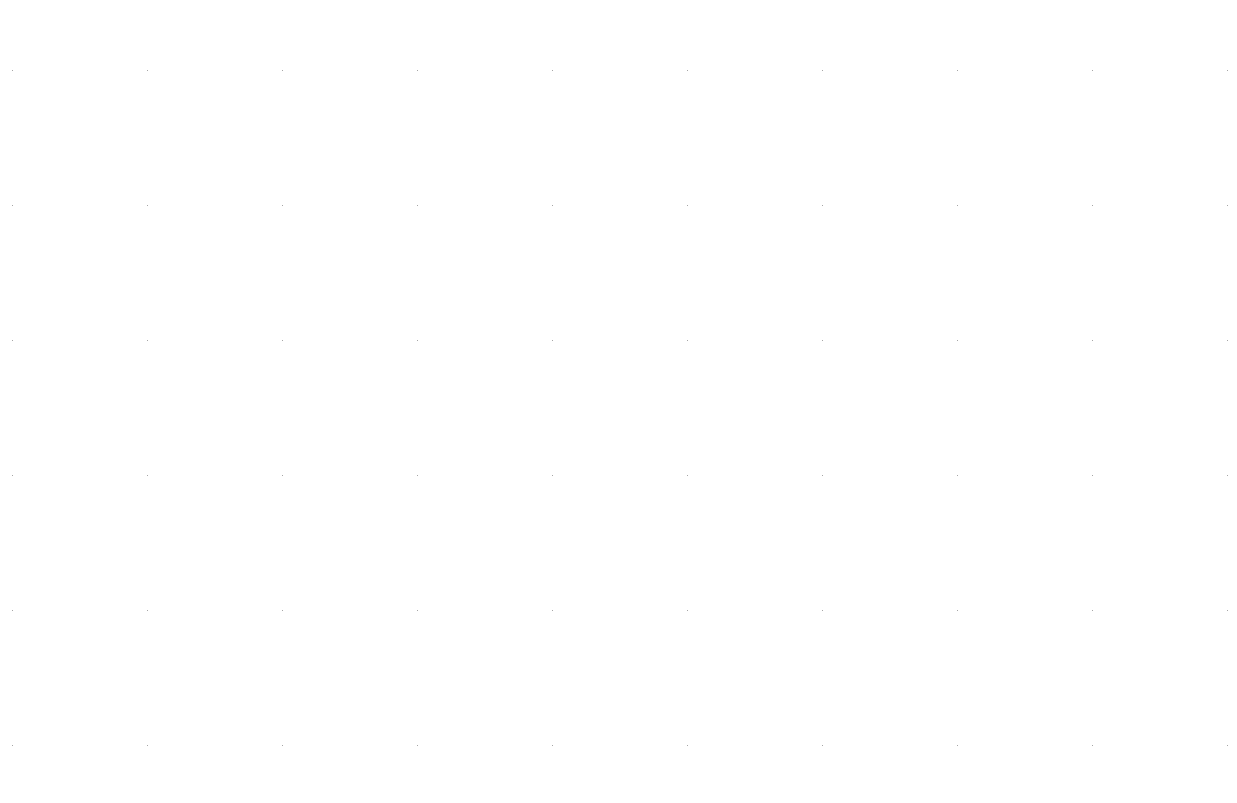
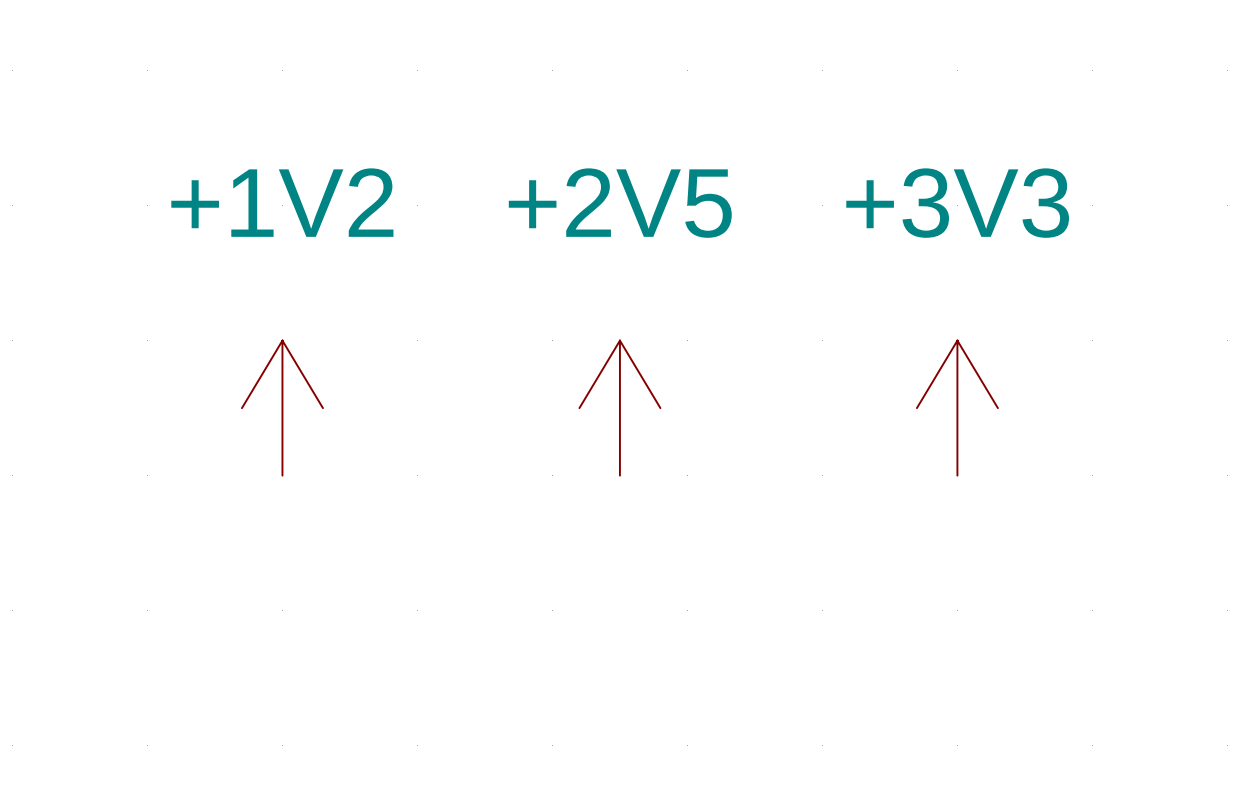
power symbol: none -> +1V2 (282, 408)
power symbol: none -> +2V5 (619, 408)
power symbol: none -> +3V3 (957, 408)

